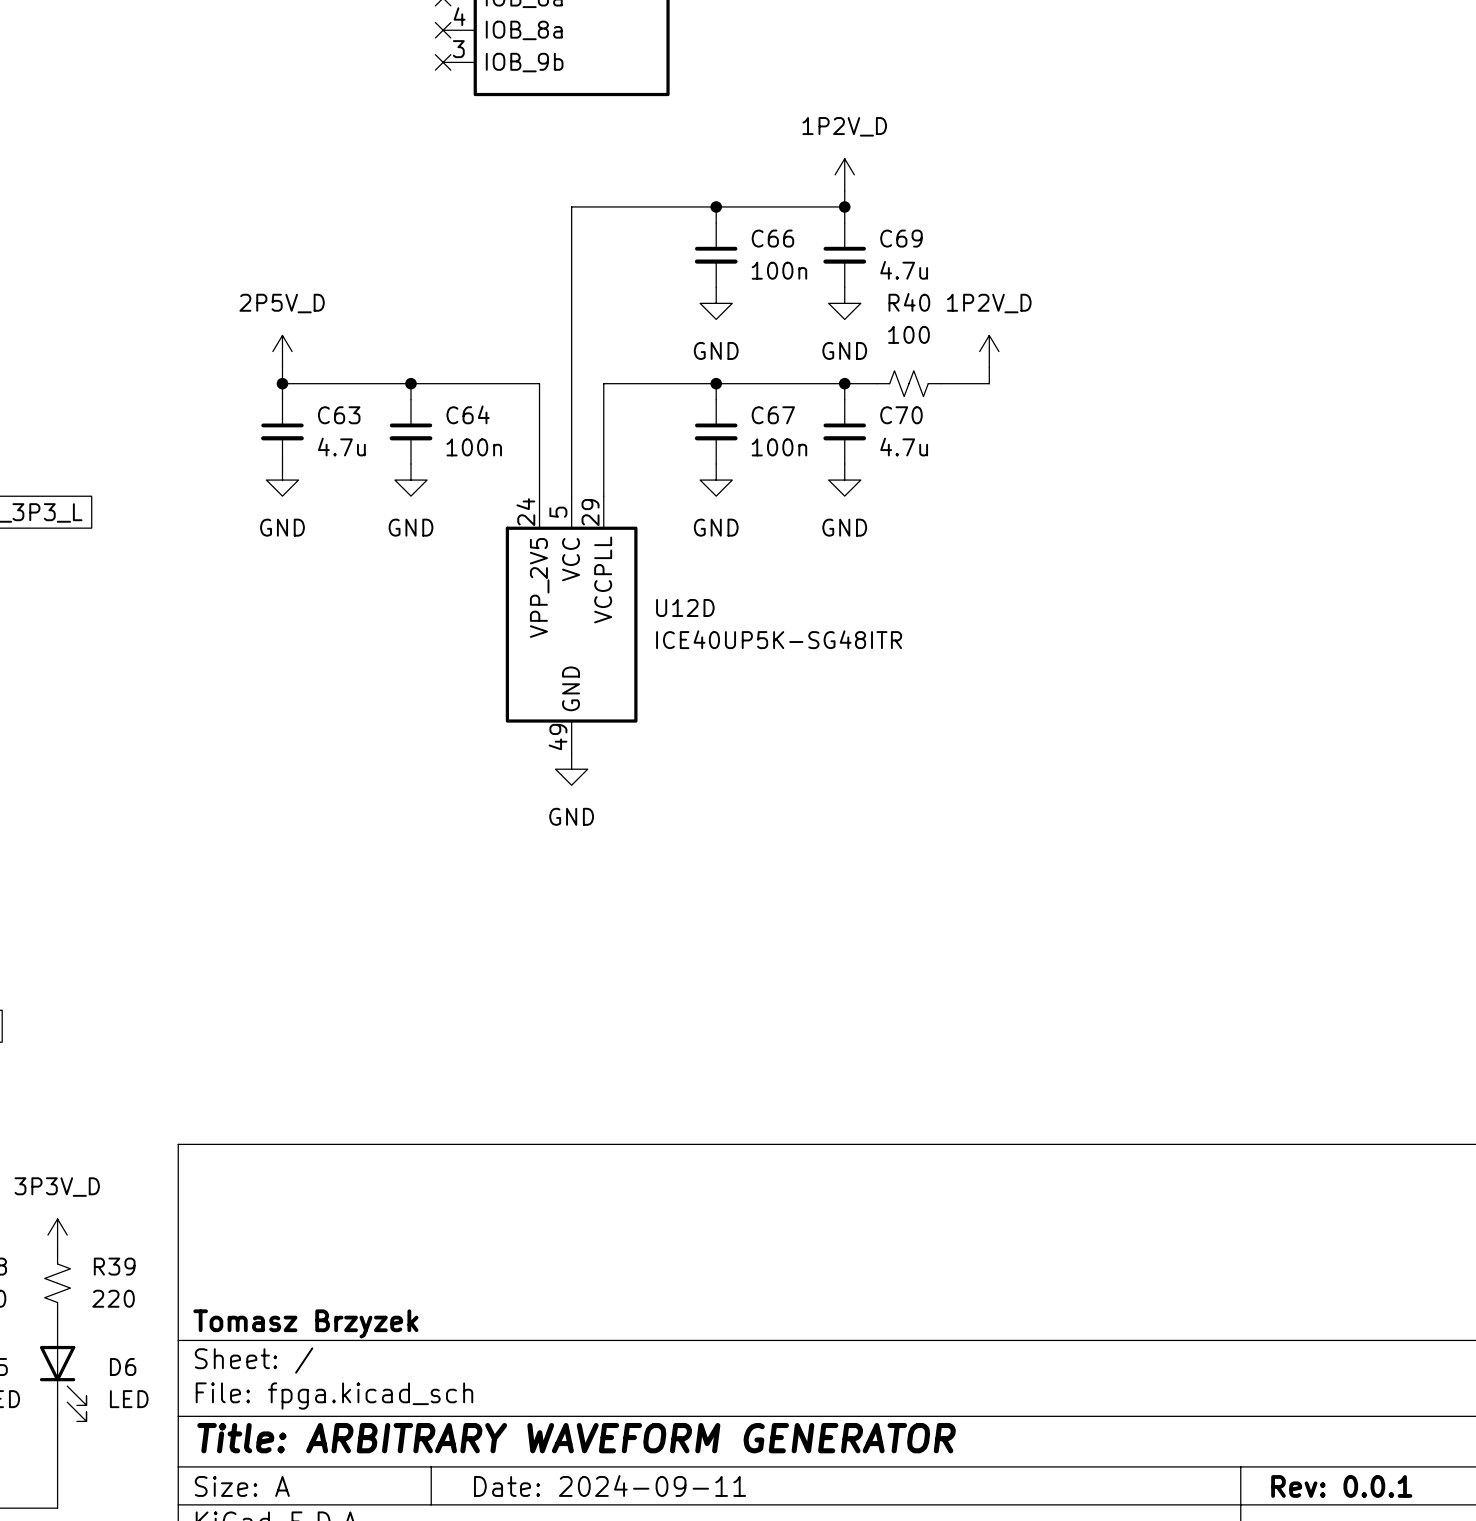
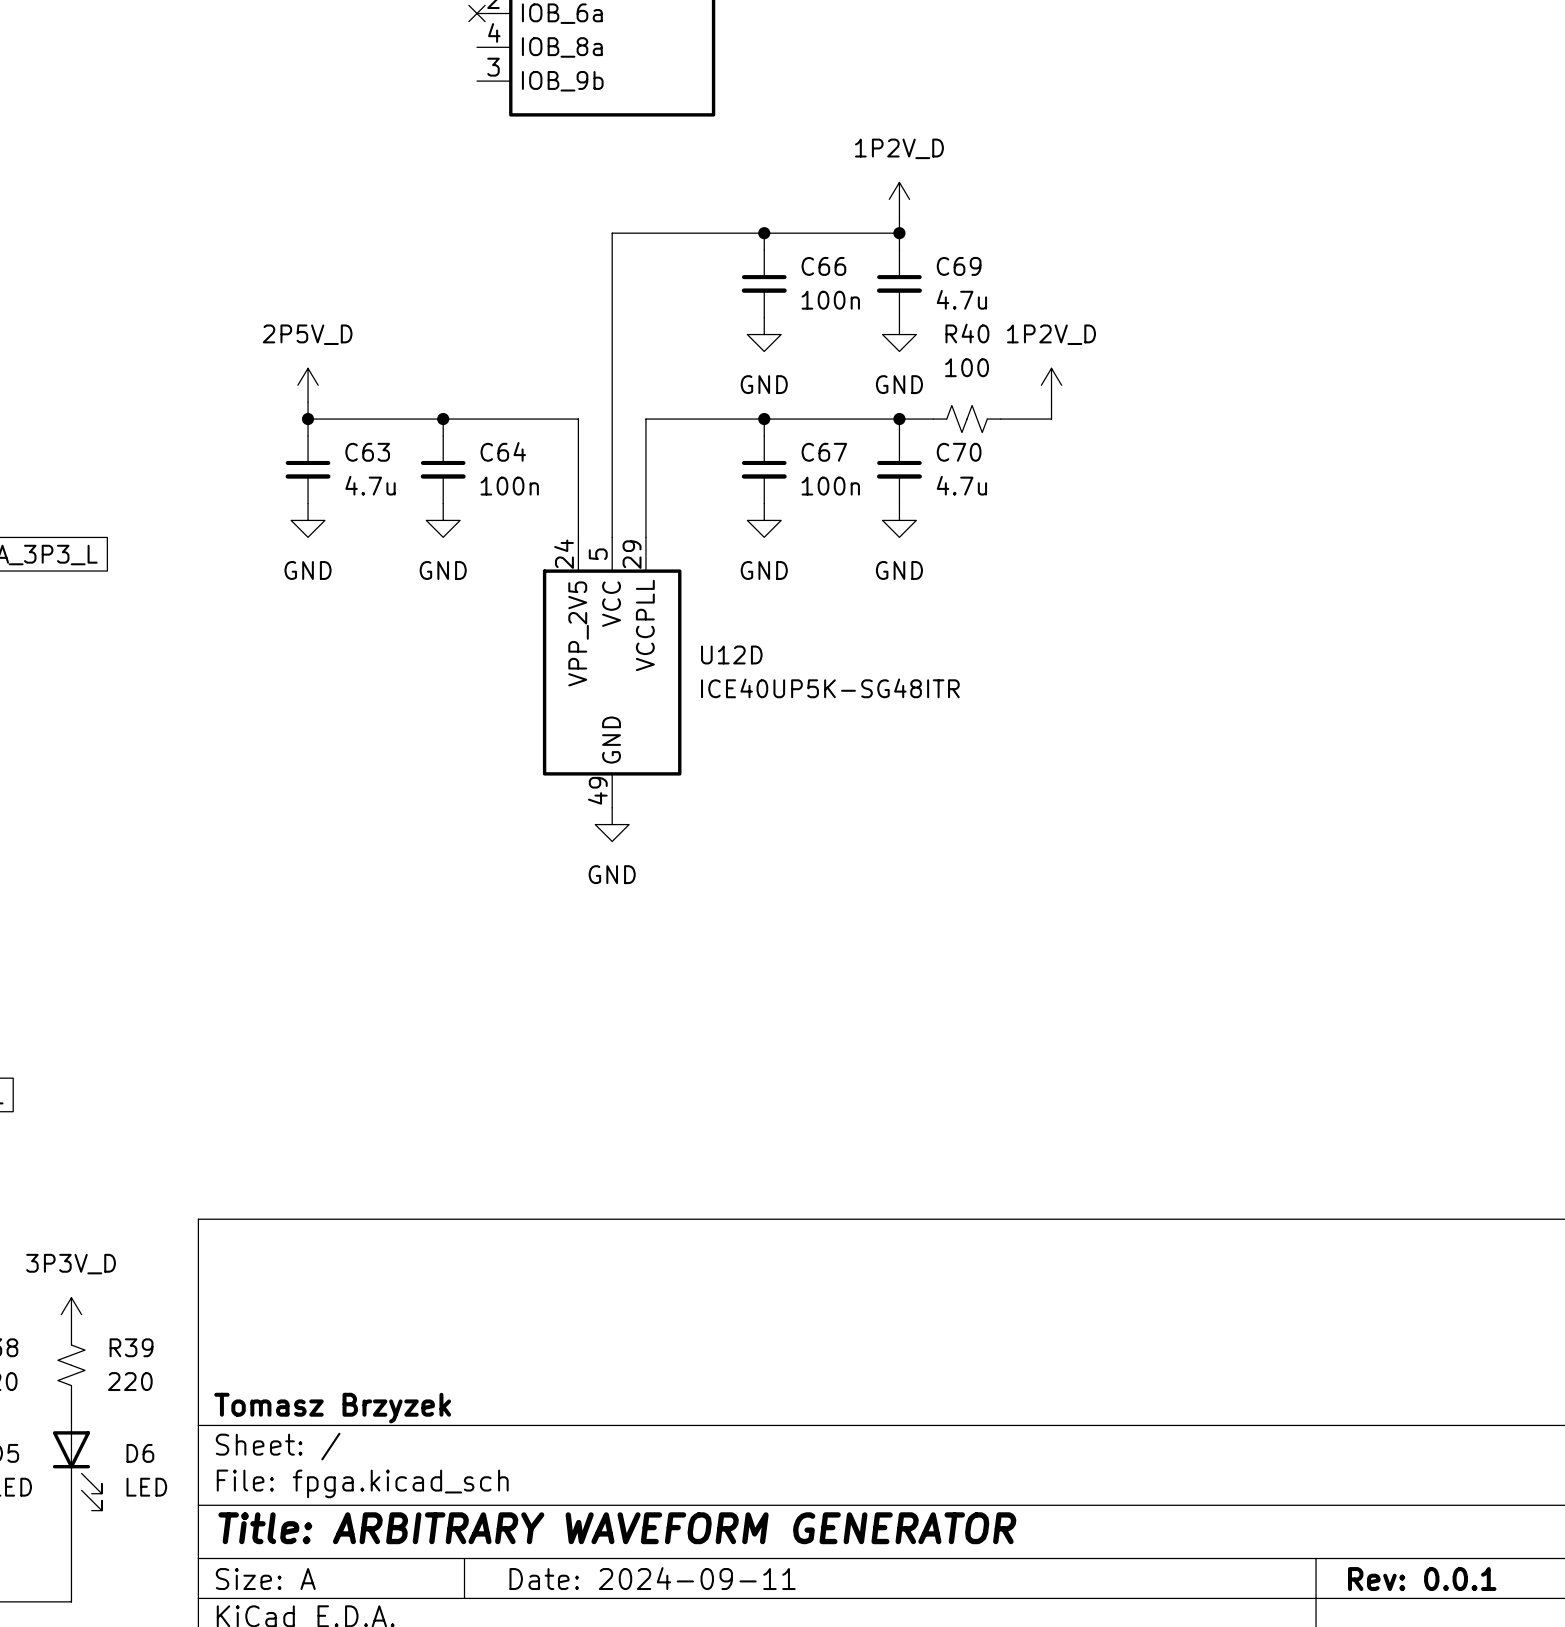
no-connect mark: (443, 30) -> none
no-connect mark: (443, 62) -> none

